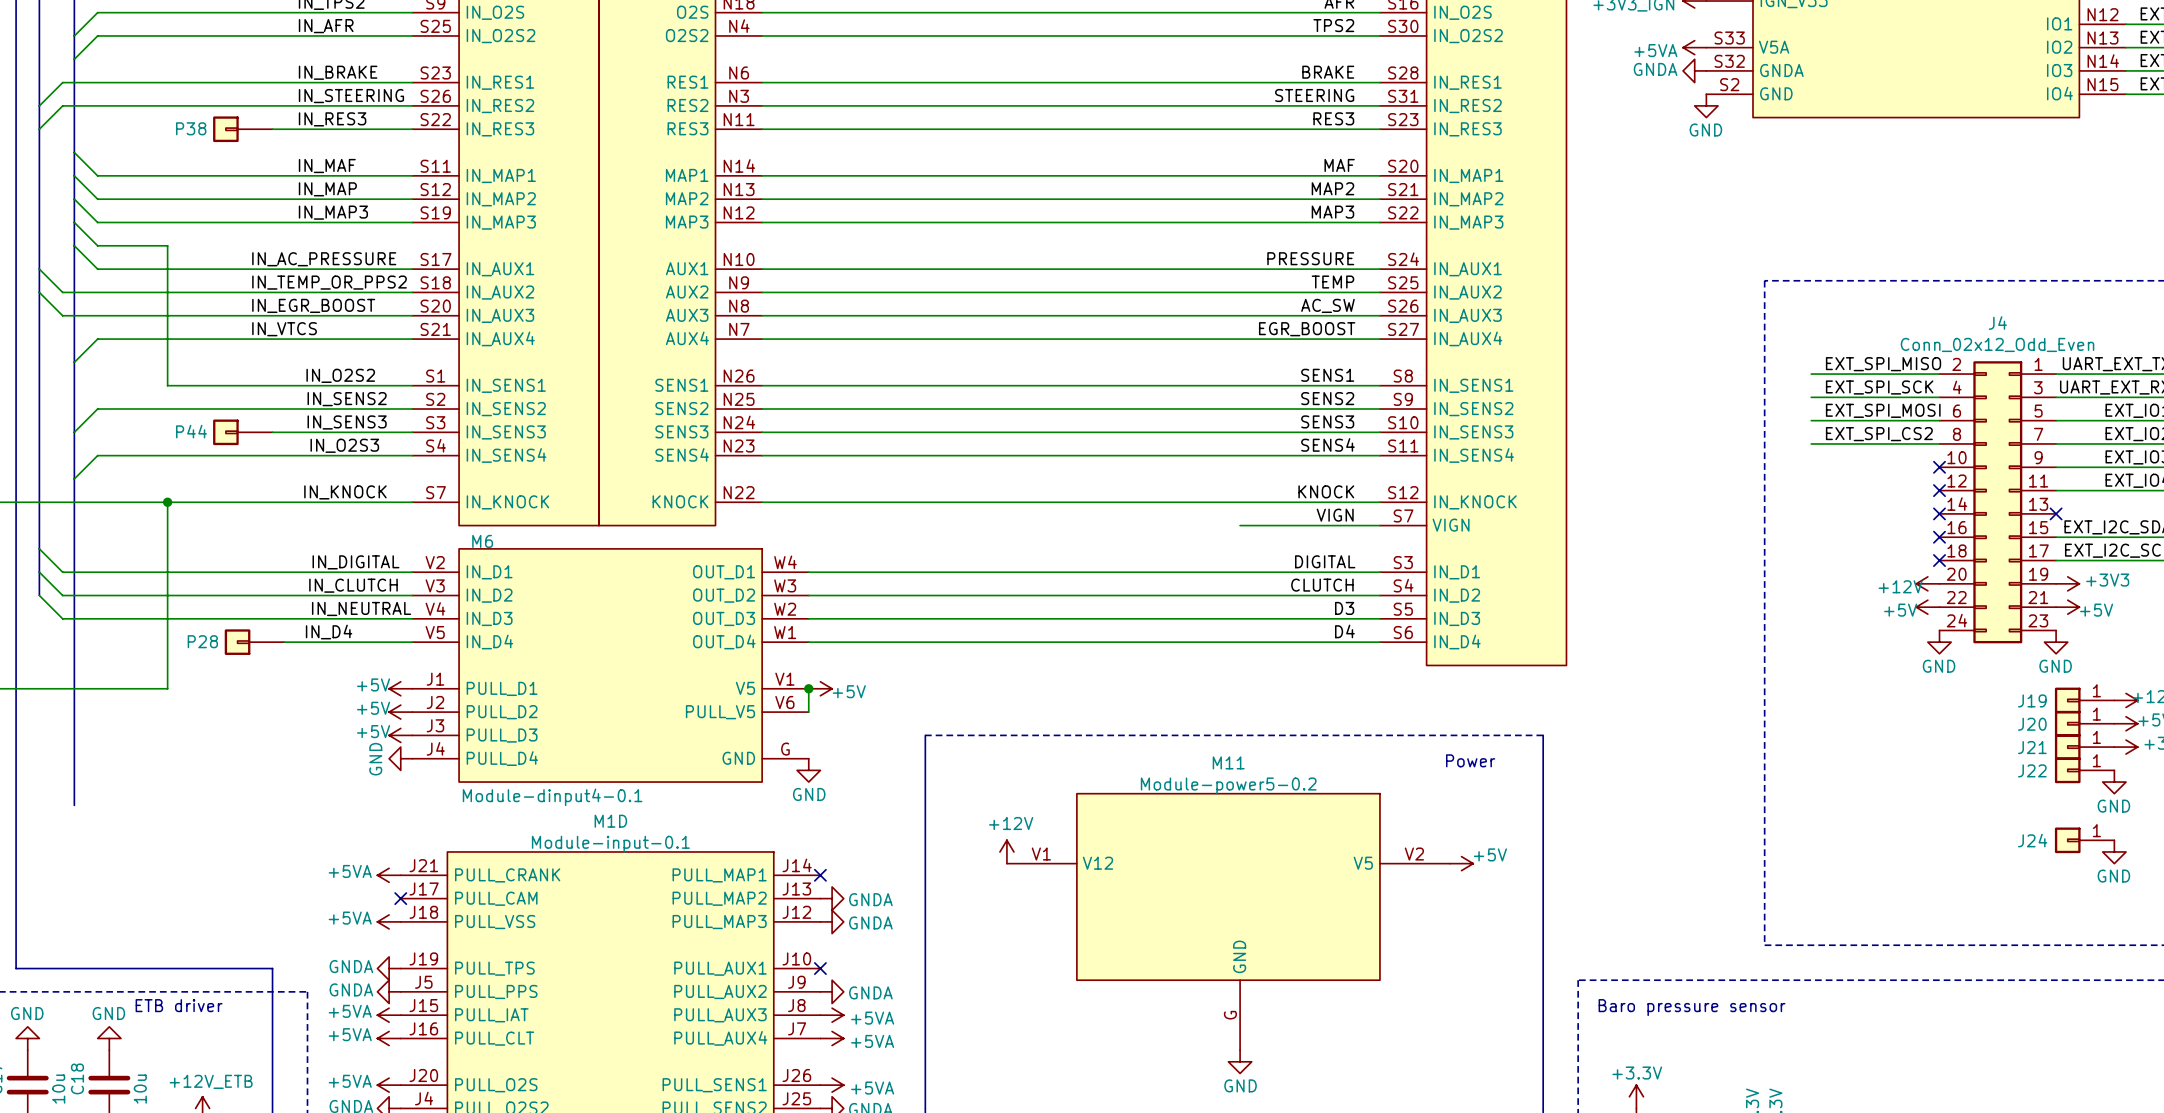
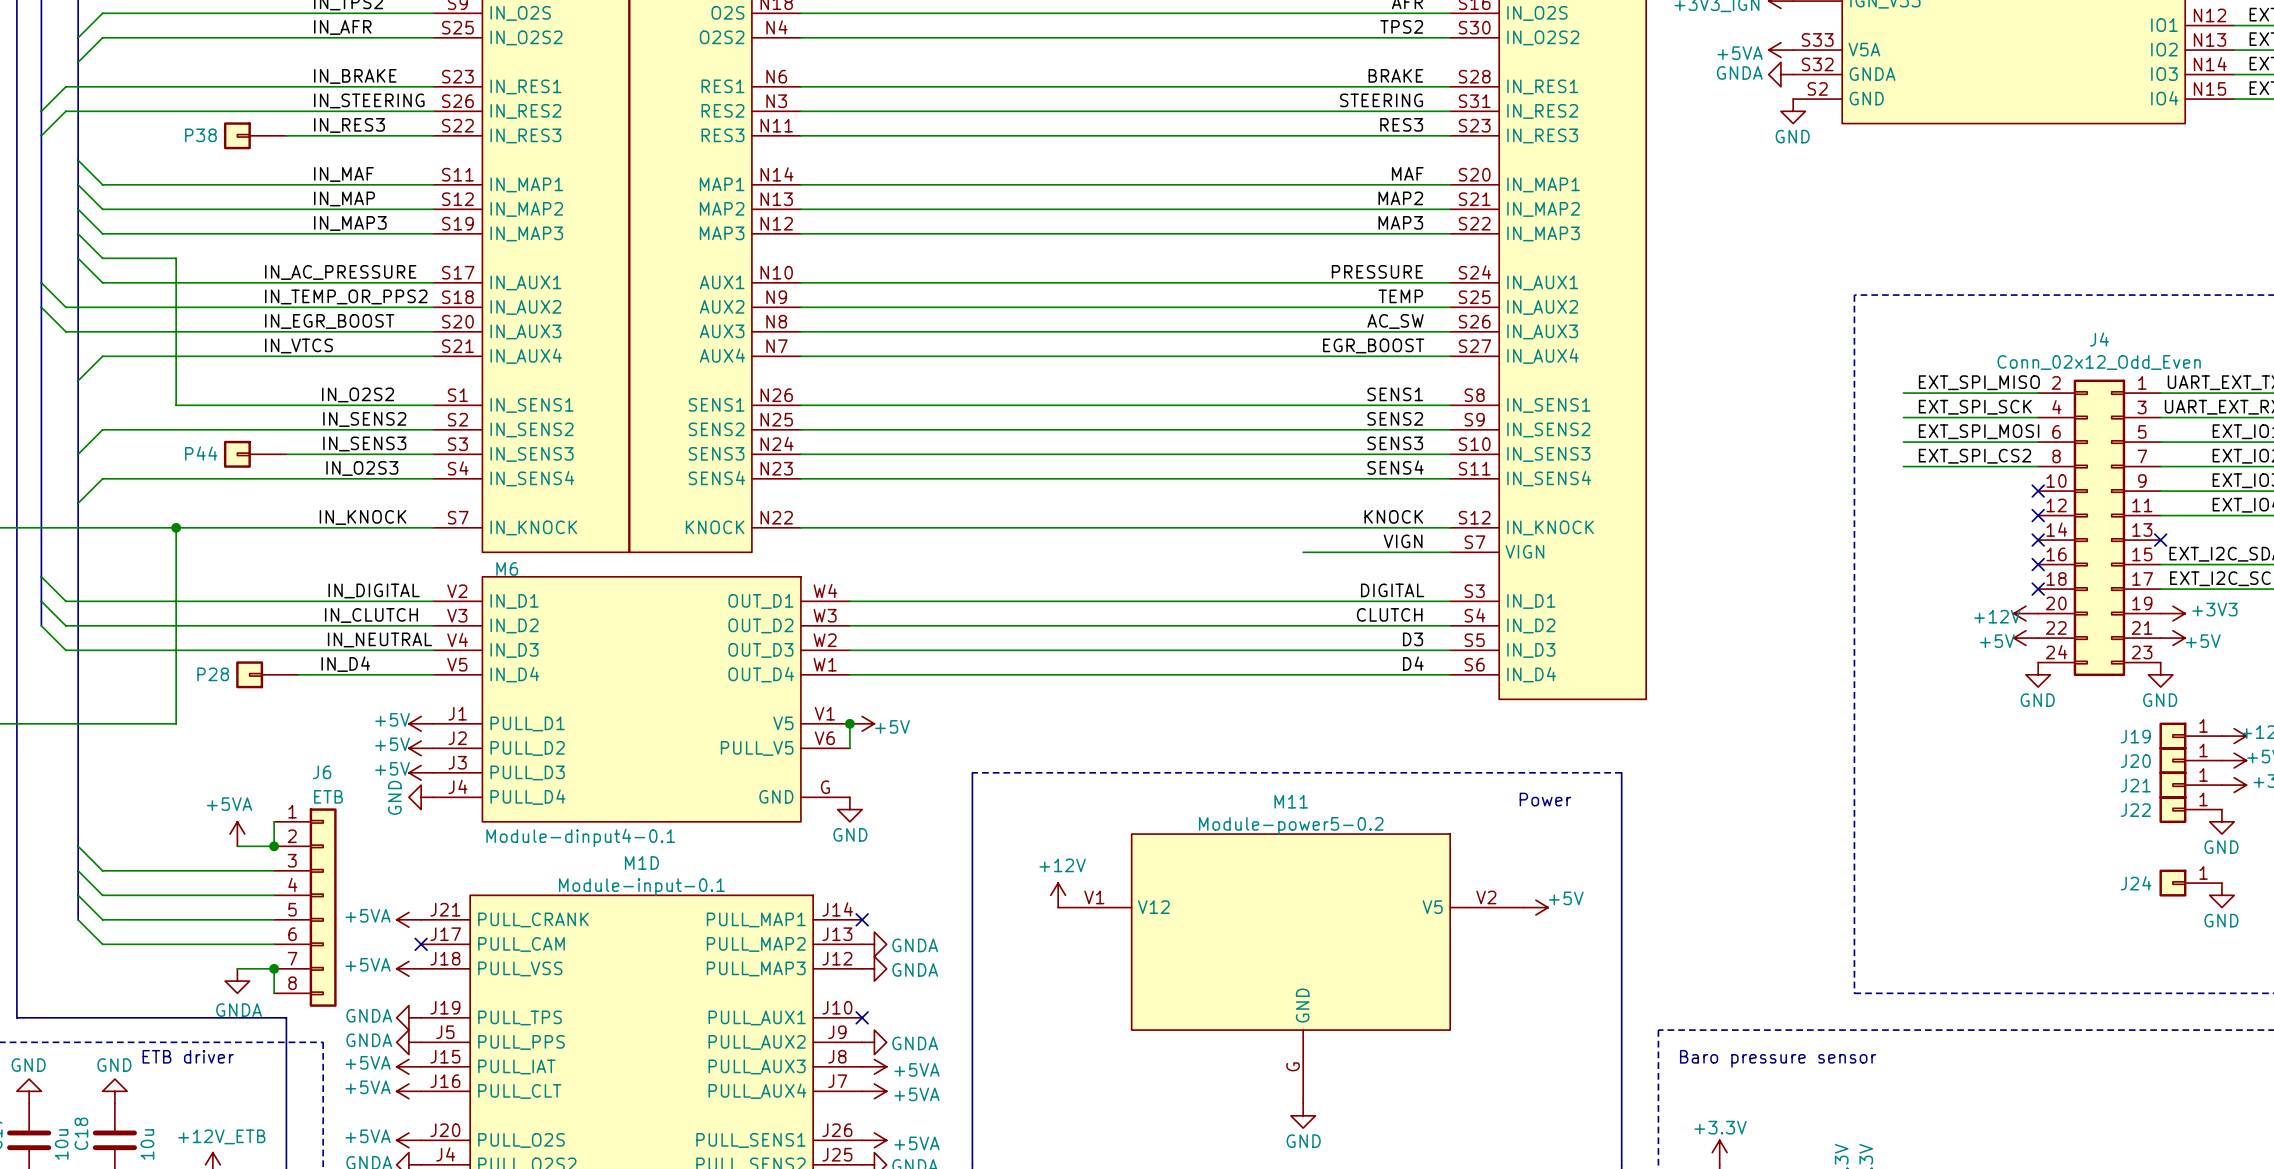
wire: none -> (274, 821) (274, 846) (237, 846)
power symbol: none -> +5VA (237, 834)
wire: none -> (78, 846) (102, 870) (274, 870)
bus: none -> (78, 846) (78, 919)
junction: none -> (274, 846)
wire: none -> (78, 870) (102, 895) (274, 895)
wire: none -> (78, 895) (102, 919) (274, 919)
J6: none -> ETB (305, 907)
wire: none -> (78, 919) (102, 944) (274, 944)
wire: none -> (237, 968) (274, 968) (274, 993)
junction: none -> (274, 968)
power symbol: none -> GNDA (237, 981)

